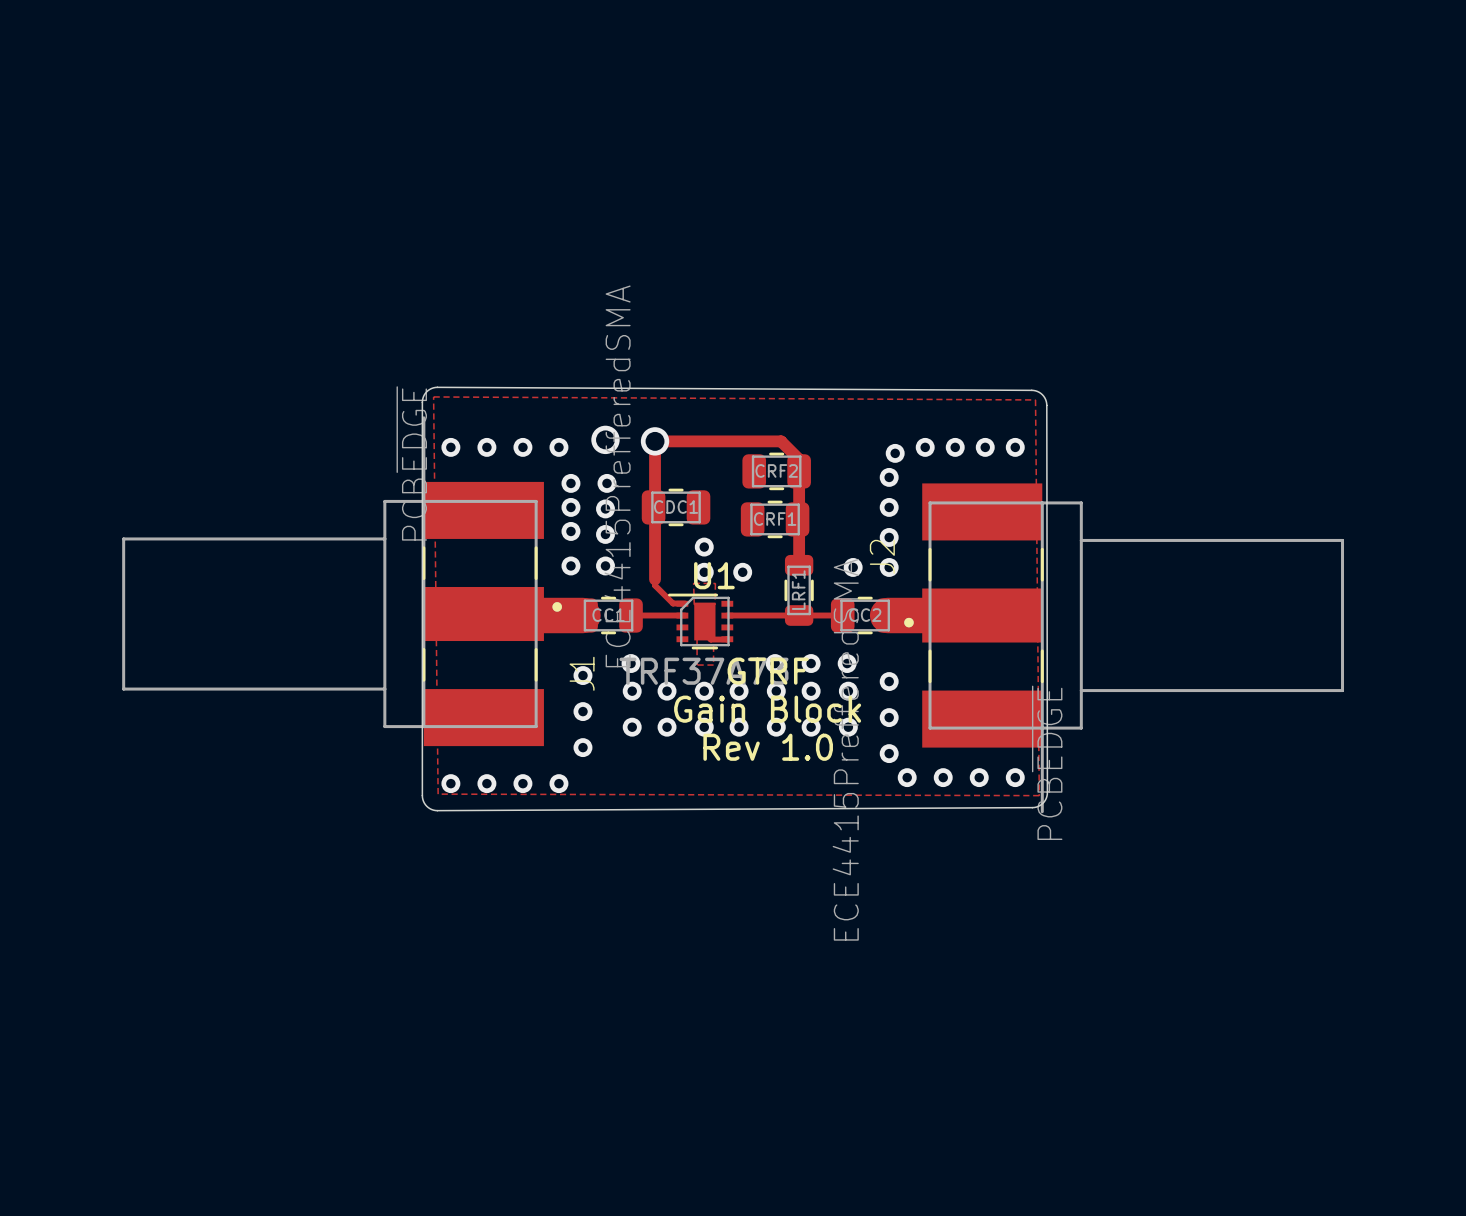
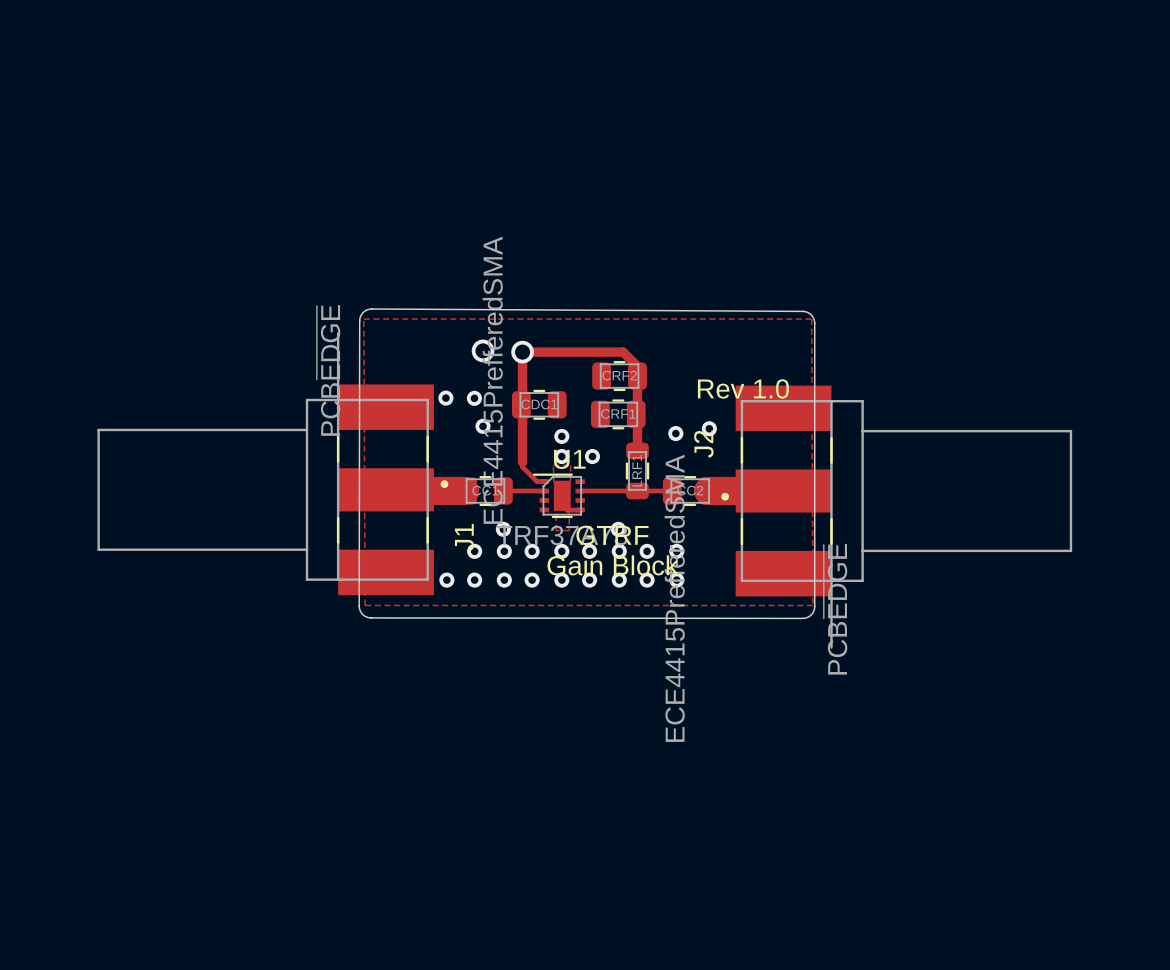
board edge: (437, 387) (1031, 390) (1040, 393) (1045, 399) (1046, 405) (1047, 792) (1044, 801) (1038, 806) (1032, 807) (437, 810) (428, 807) (423, 801) (422, 795) (422, 402) (426, 391) (437, 387) -> (371, 309) (363, 312) (359, 320) (359, 605) (363, 615) (371, 617) (802, 618) (812, 613) (814, 606) (814, 323) (810, 313) (802, 311) (371, 309)
zone outline: (433, 396) (438, 794) (1039, 795) (1035, 399) (433, 396) -> (363, 319) (365, 605) (812, 605) (811, 319) (363, 319)
via: (450, 447) -> none
via: (486, 447) -> none
via: (522, 447) -> none
via: (558, 447) -> none
via: (925, 447) -> none
via: (955, 447) -> none
via: (985, 447) -> none
via: (1015, 447) -> none
via: (895, 453) -> none
via: (889, 477) -> none
via: (570, 483) -> none
via: (606, 483) -> none
via: none -> (445, 398)
via: none -> (474, 398)
via: (570, 507) -> none
via: (889, 507) -> none
via: (605, 508) -> none
via: (570, 531) -> none
via: none -> (675, 433)
via: (570, 565) -> none
via: (605, 565) -> none
via: (853, 567) -> none
via: (889, 567) -> none
via: (811, 663) -> none
via: (847, 663) -> none
via position: (582, 675) -> (474, 551)
via: (889, 681) -> none
via position: (582, 711) -> (474, 580)
via: (889, 717) -> none
via: none -> (446, 580)
via: (582, 747) -> none
text position: Rev 1.0 (768, 747) -> Rev 1.0 (743, 388)
via: (889, 753) -> none
via: (907, 777) -> none
via: (943, 777) -> none
via: (979, 777) -> none
via: (1015, 777) -> none
via: (450, 783) -> none
via: (486, 783) -> none
via: (522, 783) -> none
via: (558, 783) -> none

